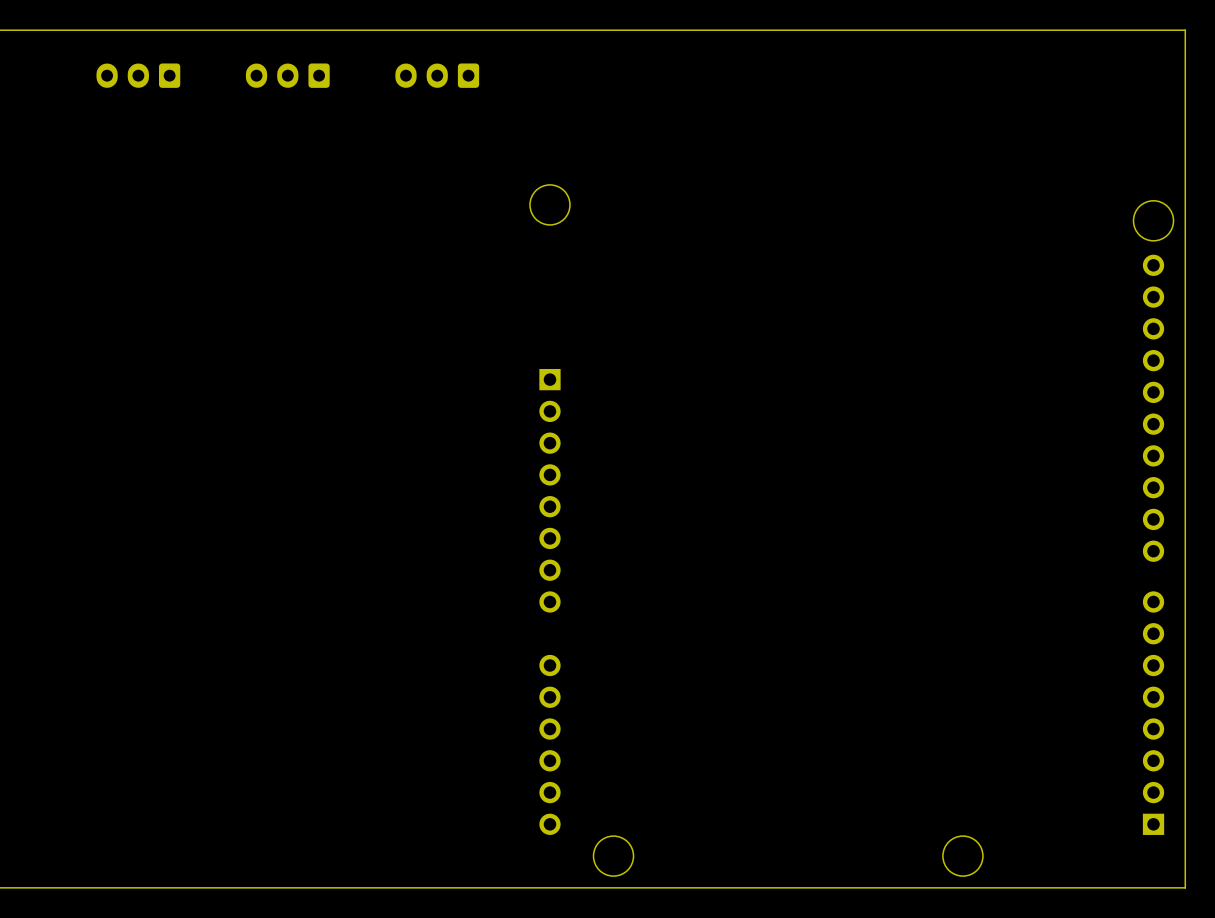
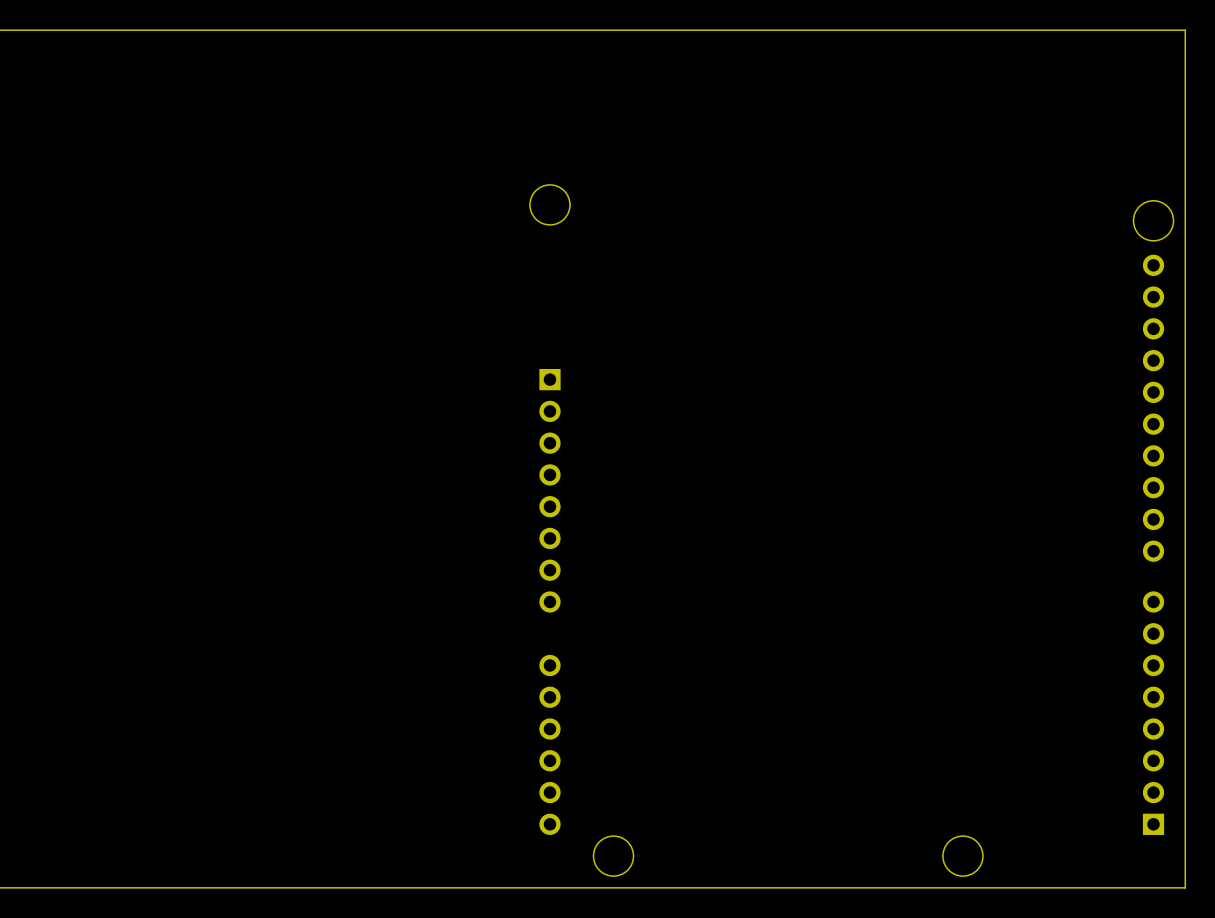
part: (138, 75) -> none
part: (287, 75) -> none
part: (437, 75) -> none

